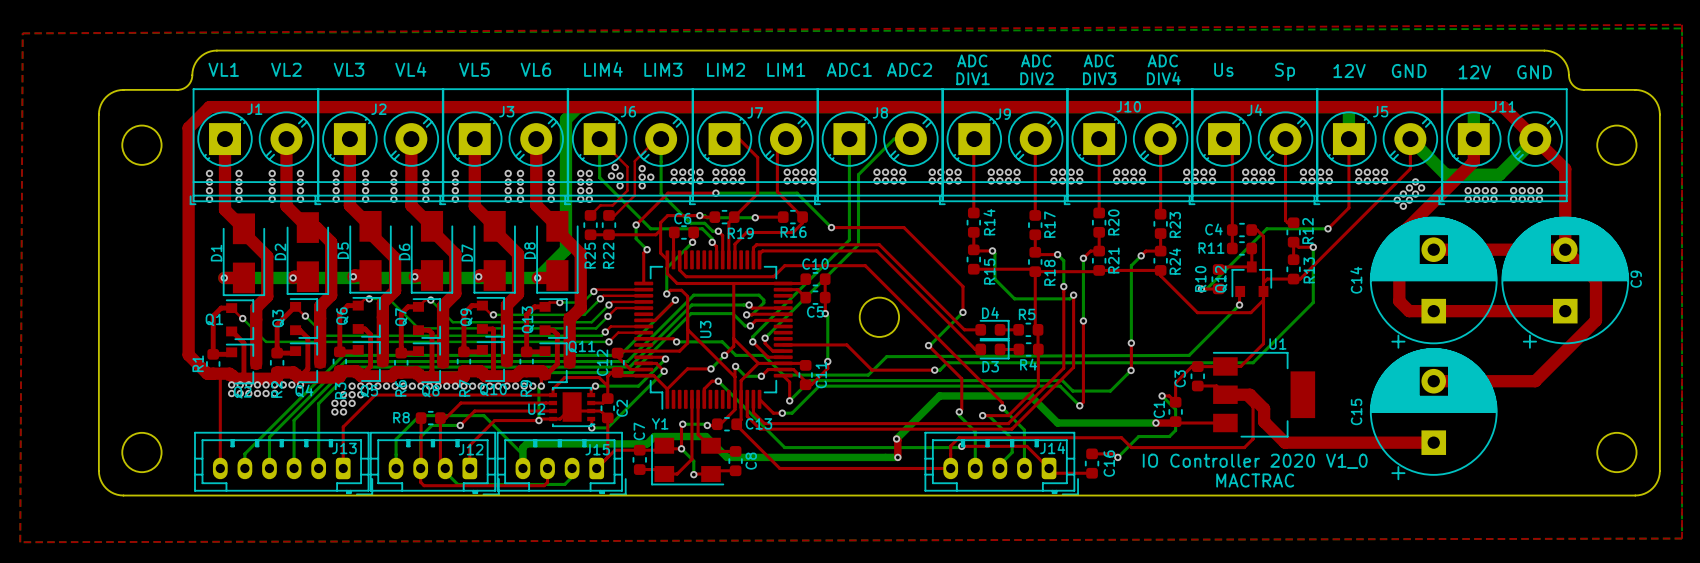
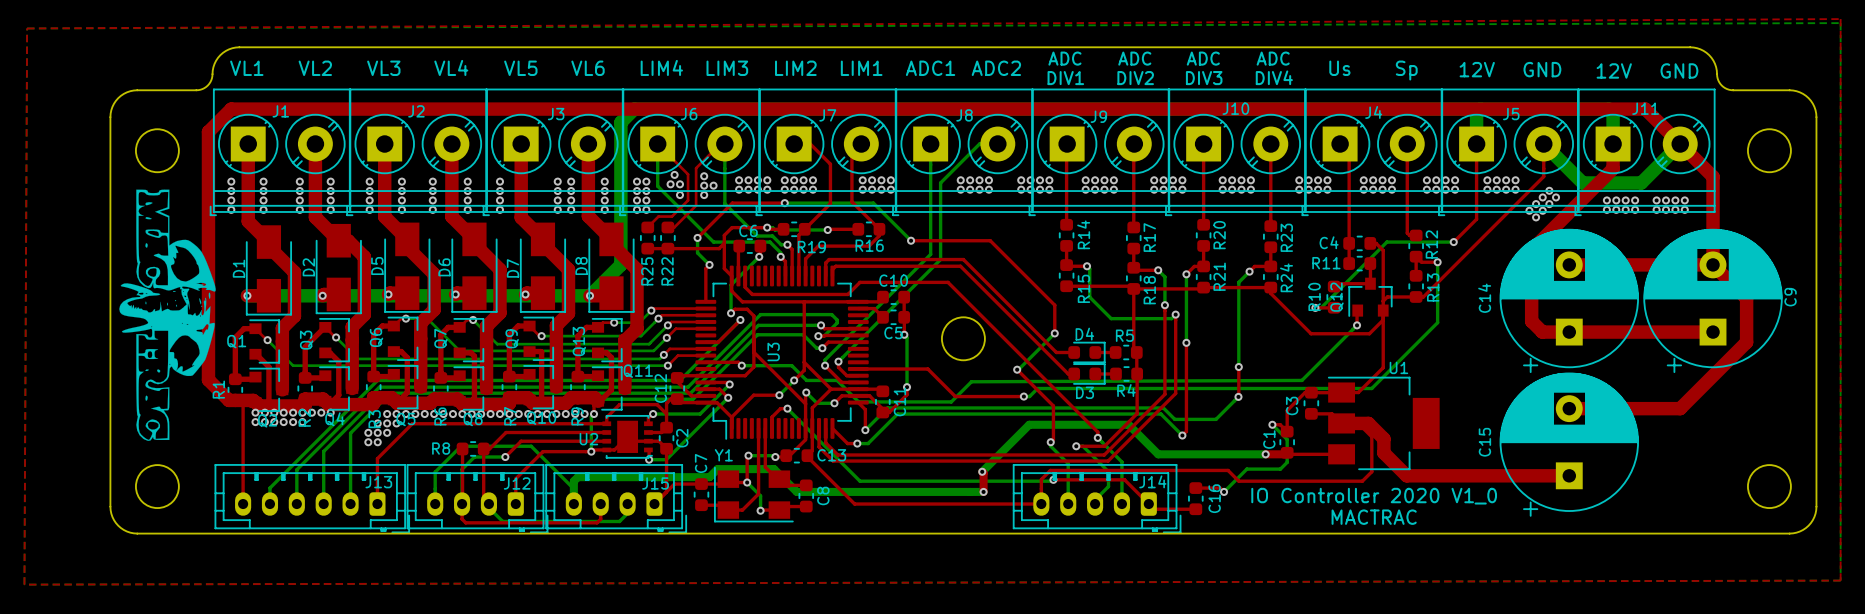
drawing: none -> [119, 189, 216, 441]

